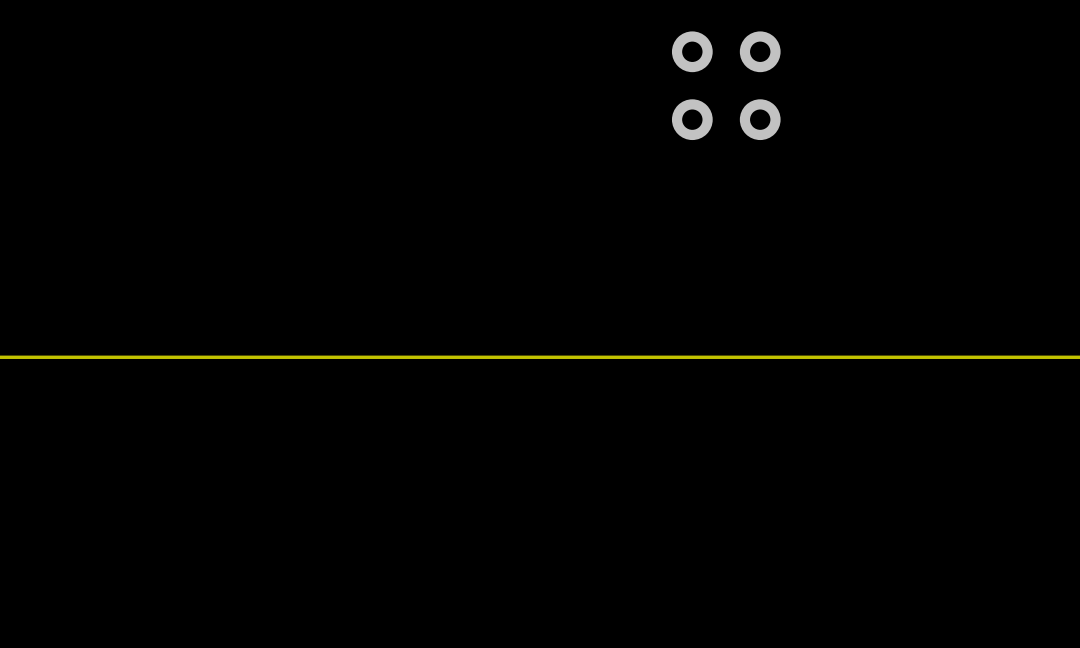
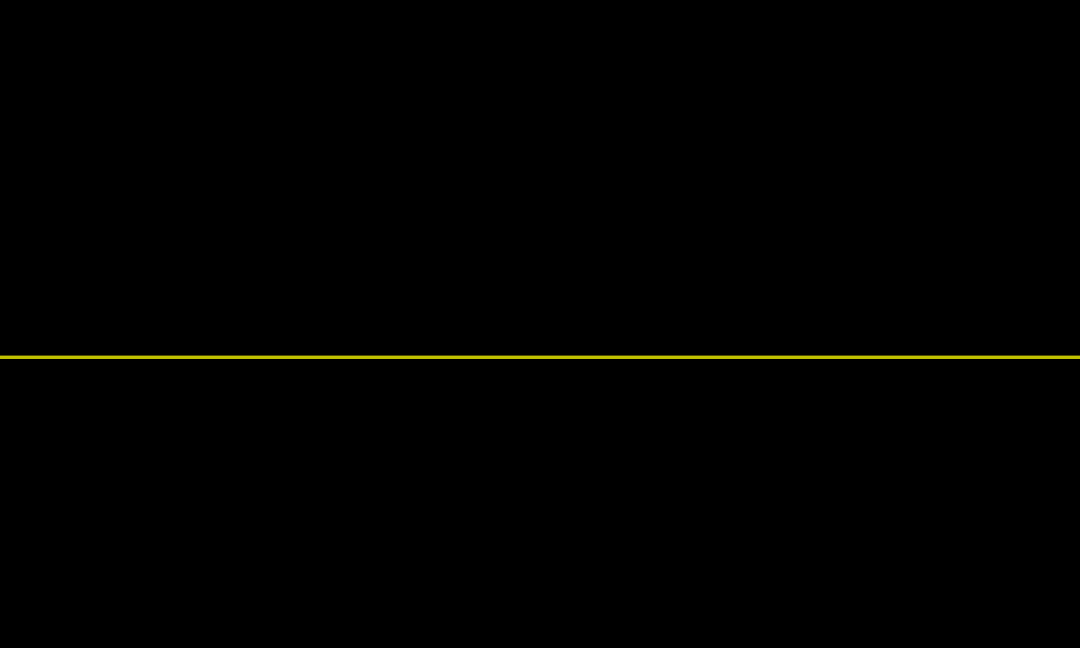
via: (692, 51) -> none
via: (760, 51) -> none
via: (692, 119) -> none
via: (760, 119) -> none

